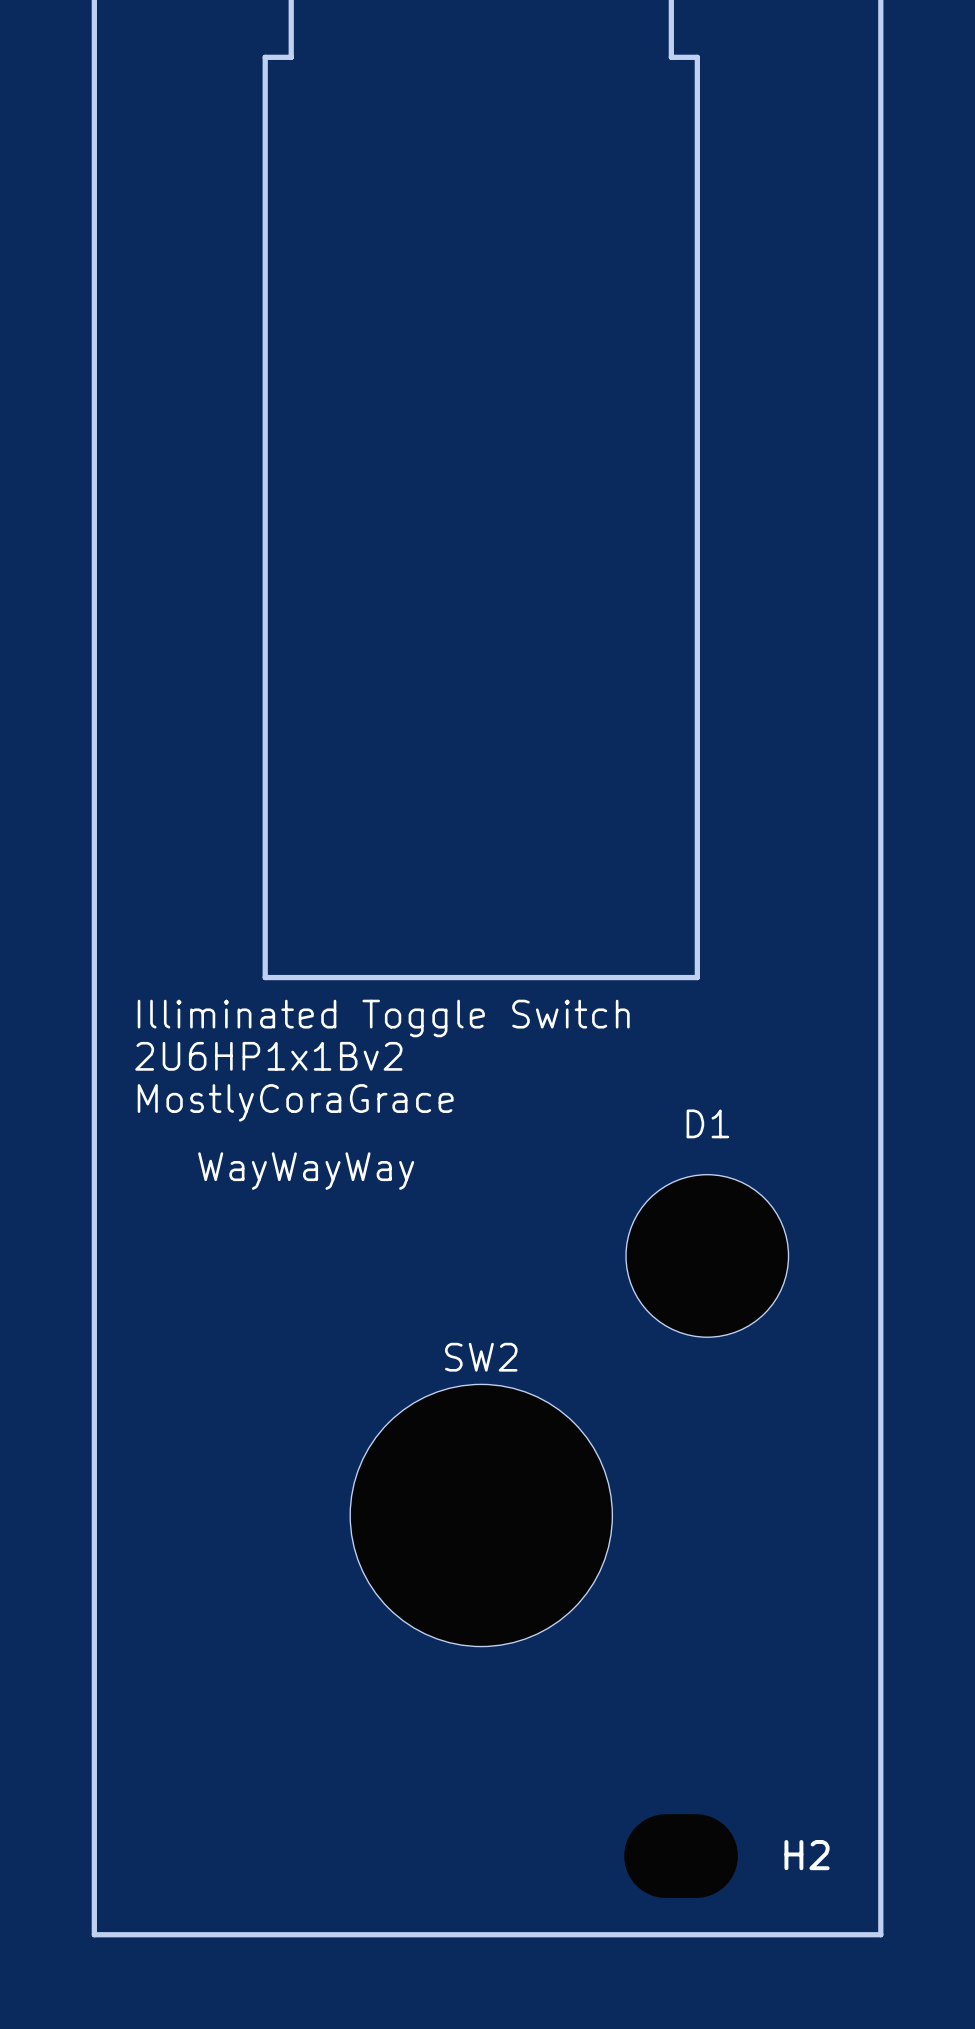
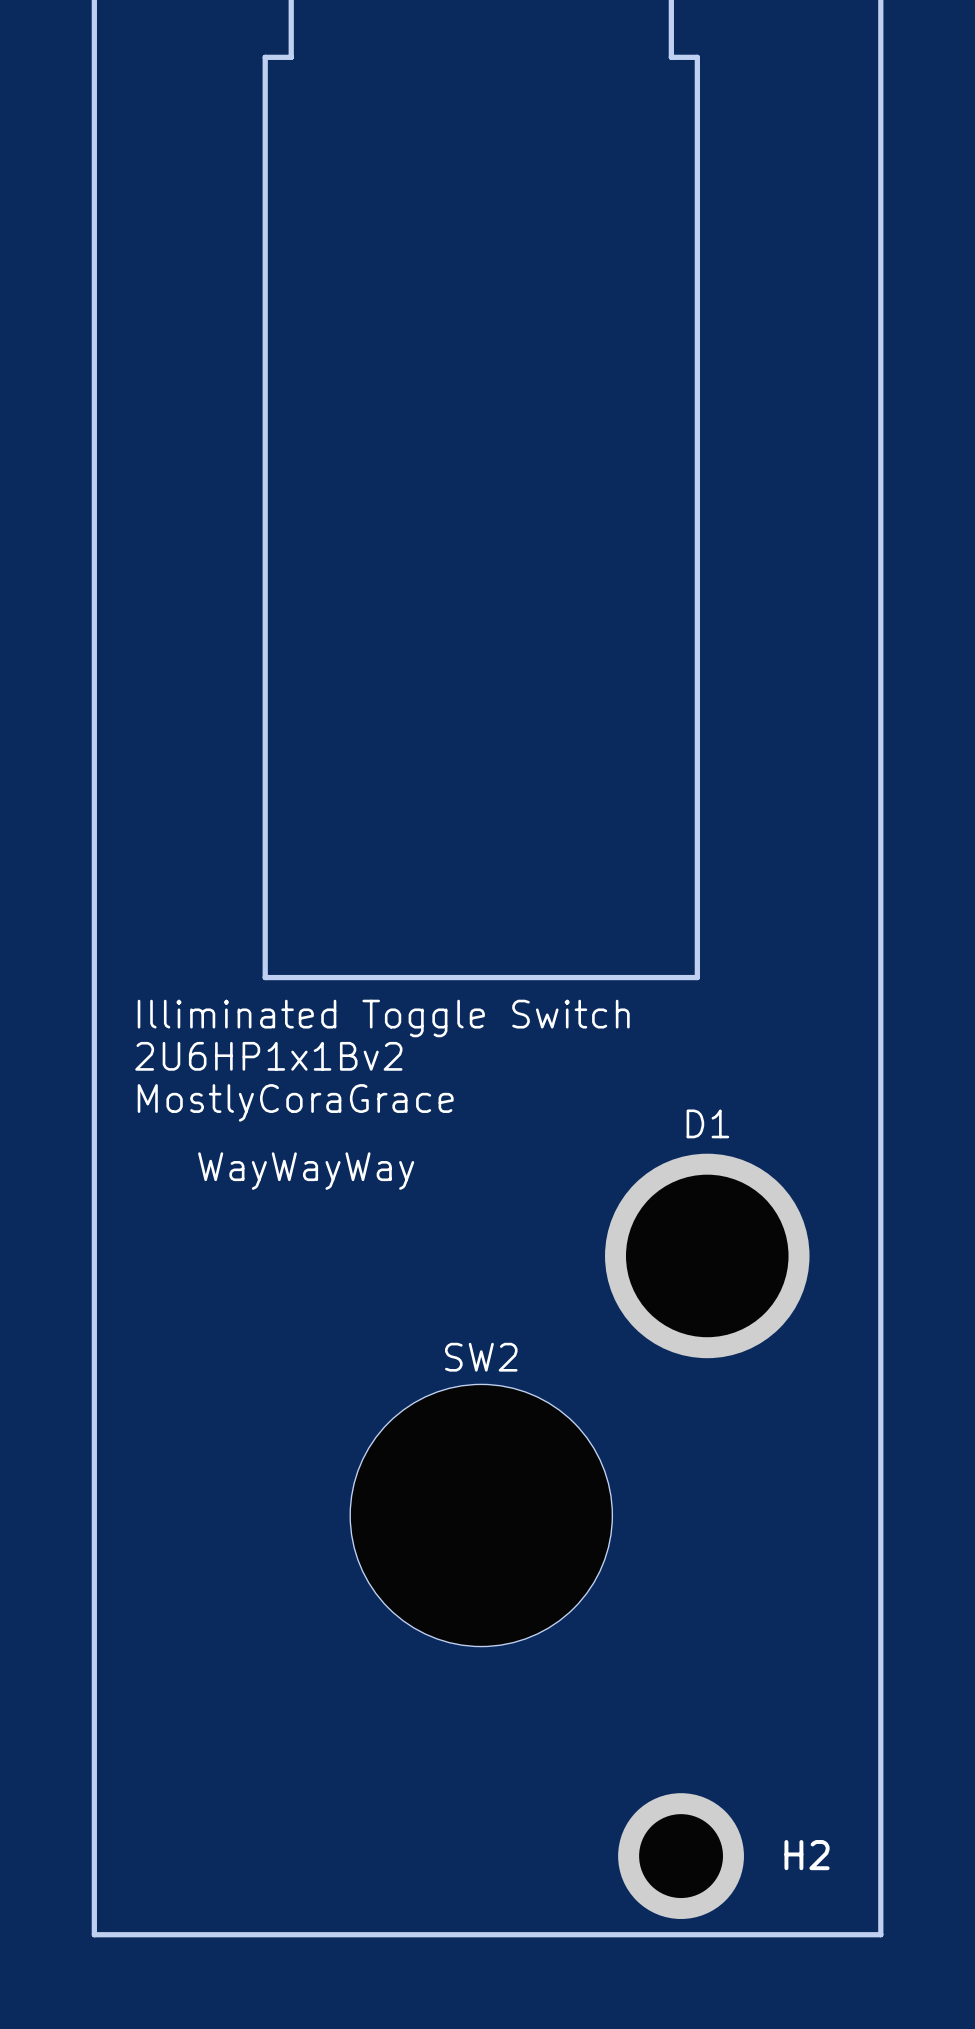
D1 footprint: [625, 1174, 789, 1338] -> [605, 1153, 810, 1359]
H2 footprint: [624, 1814, 738, 1899] -> [618, 1793, 744, 1919]

